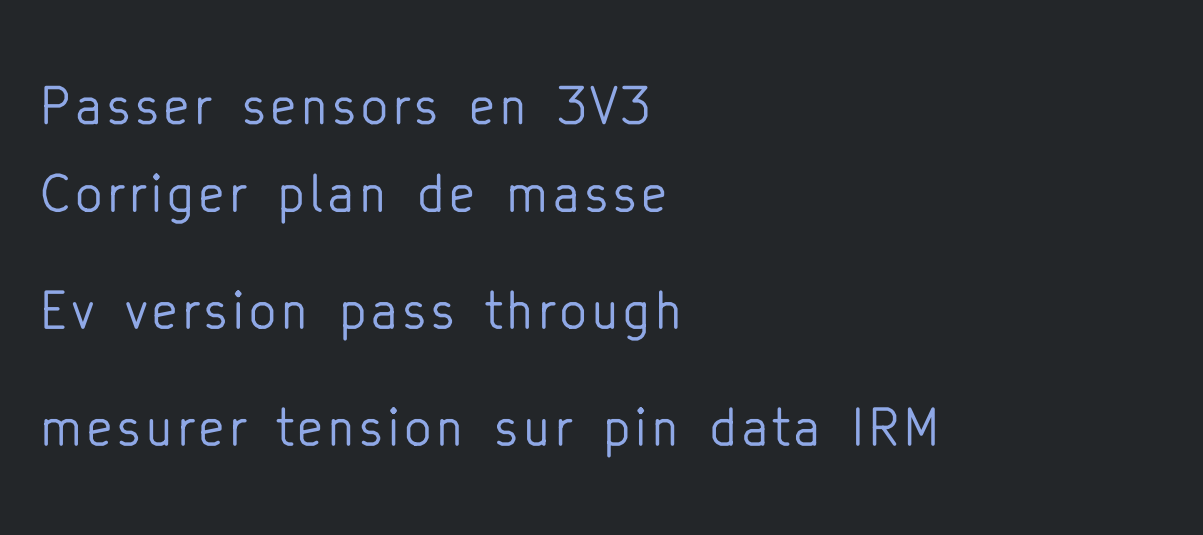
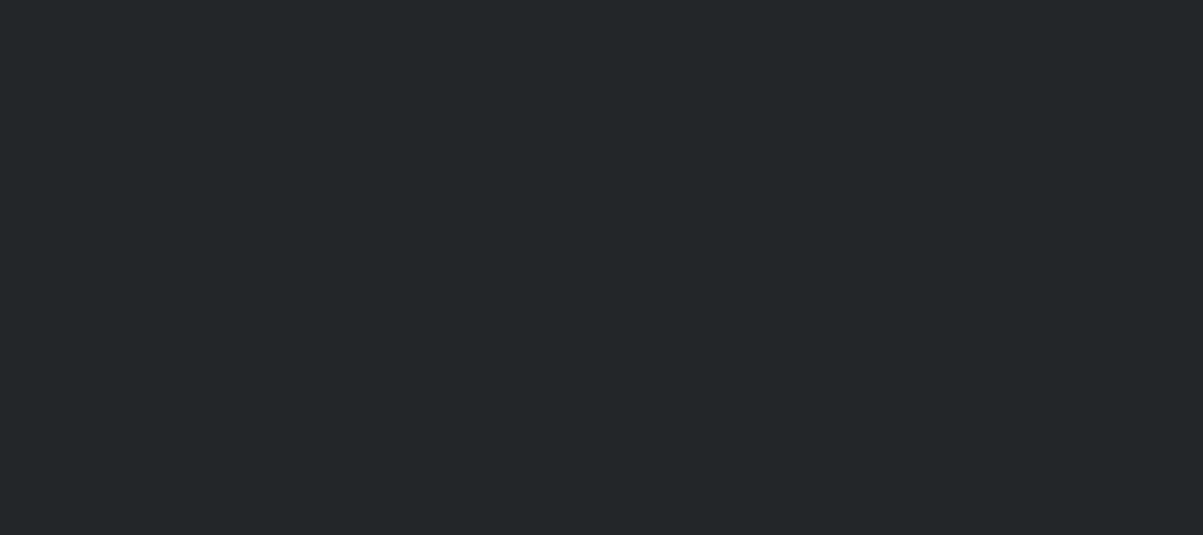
text: Passer sensors en 3V3 (345, 105) -> none
text: Corriger plan de masse (353, 198) -> none
text: Ev version pass through (360, 315) -> none
text: mesurer tension sur pin data IRM (489, 432) -> none

